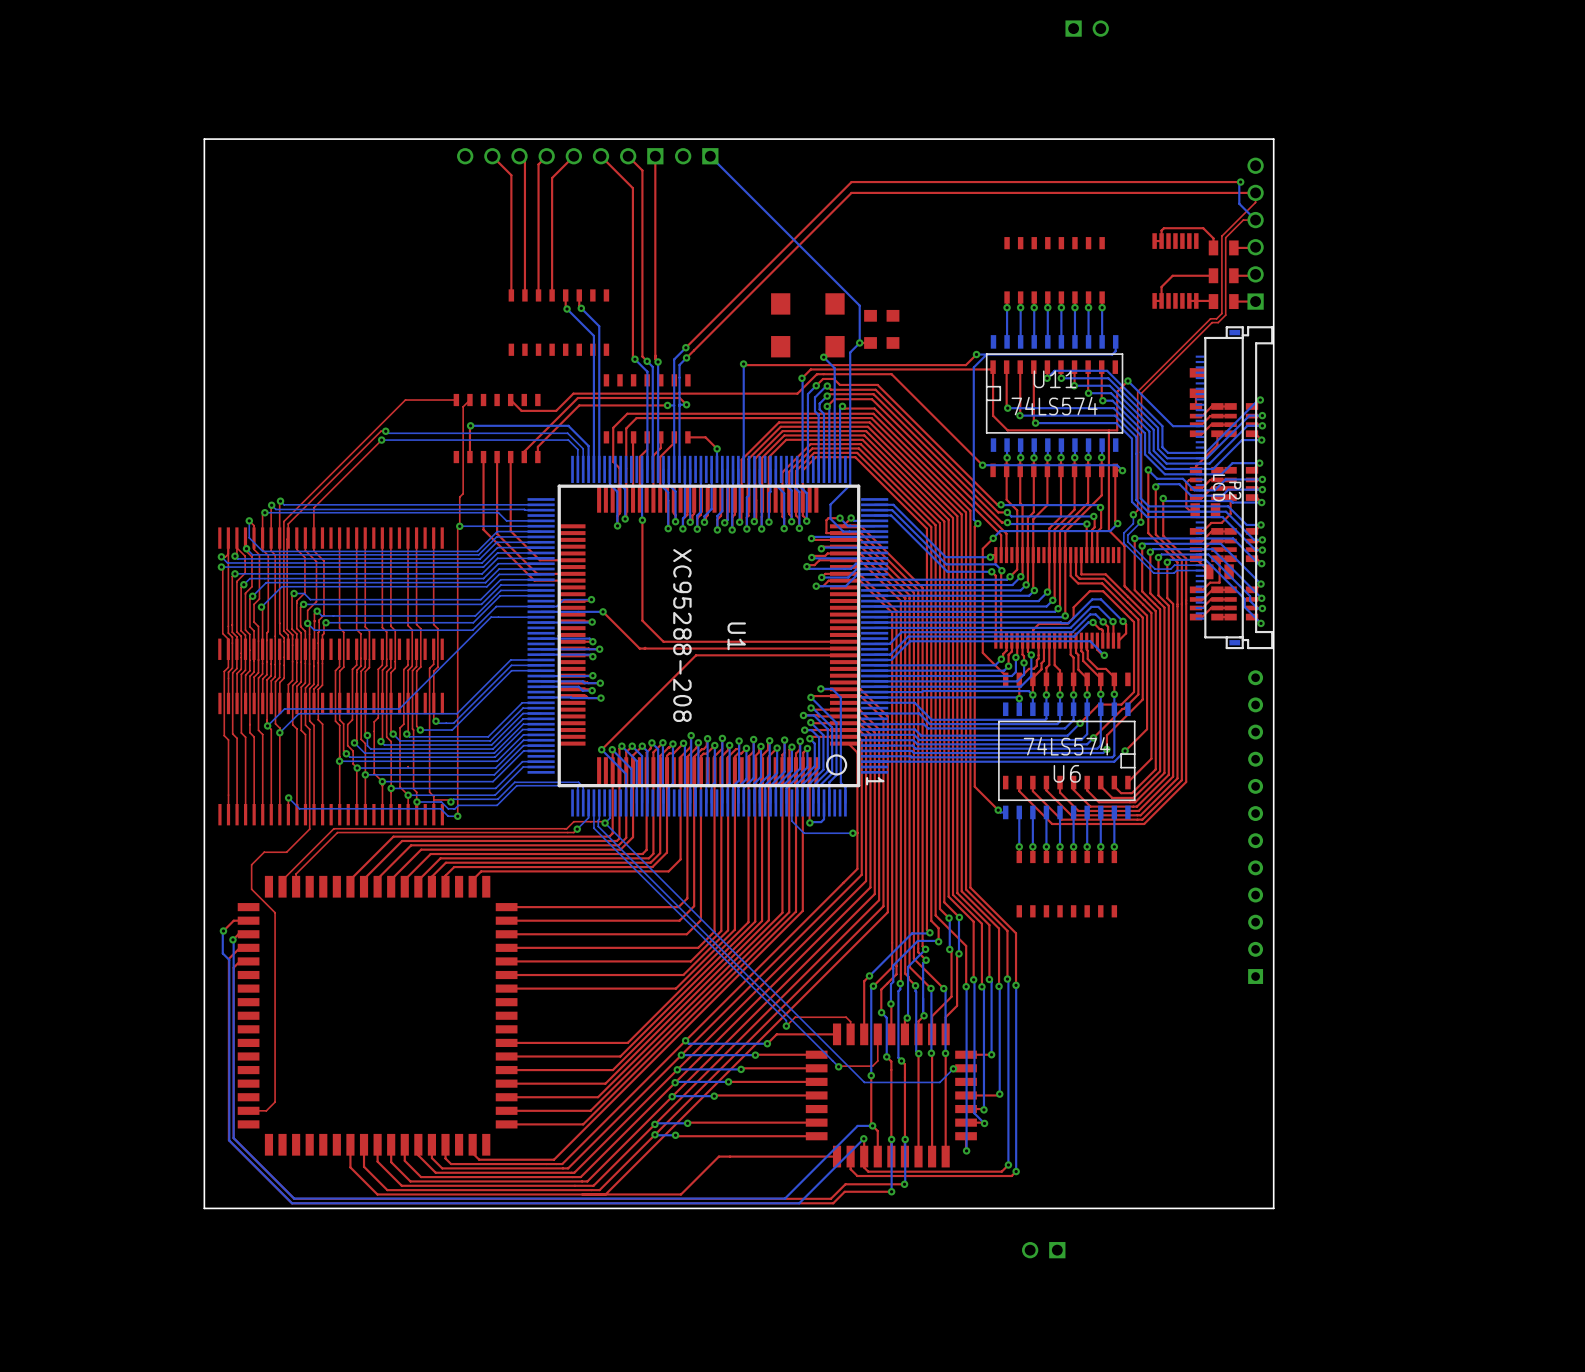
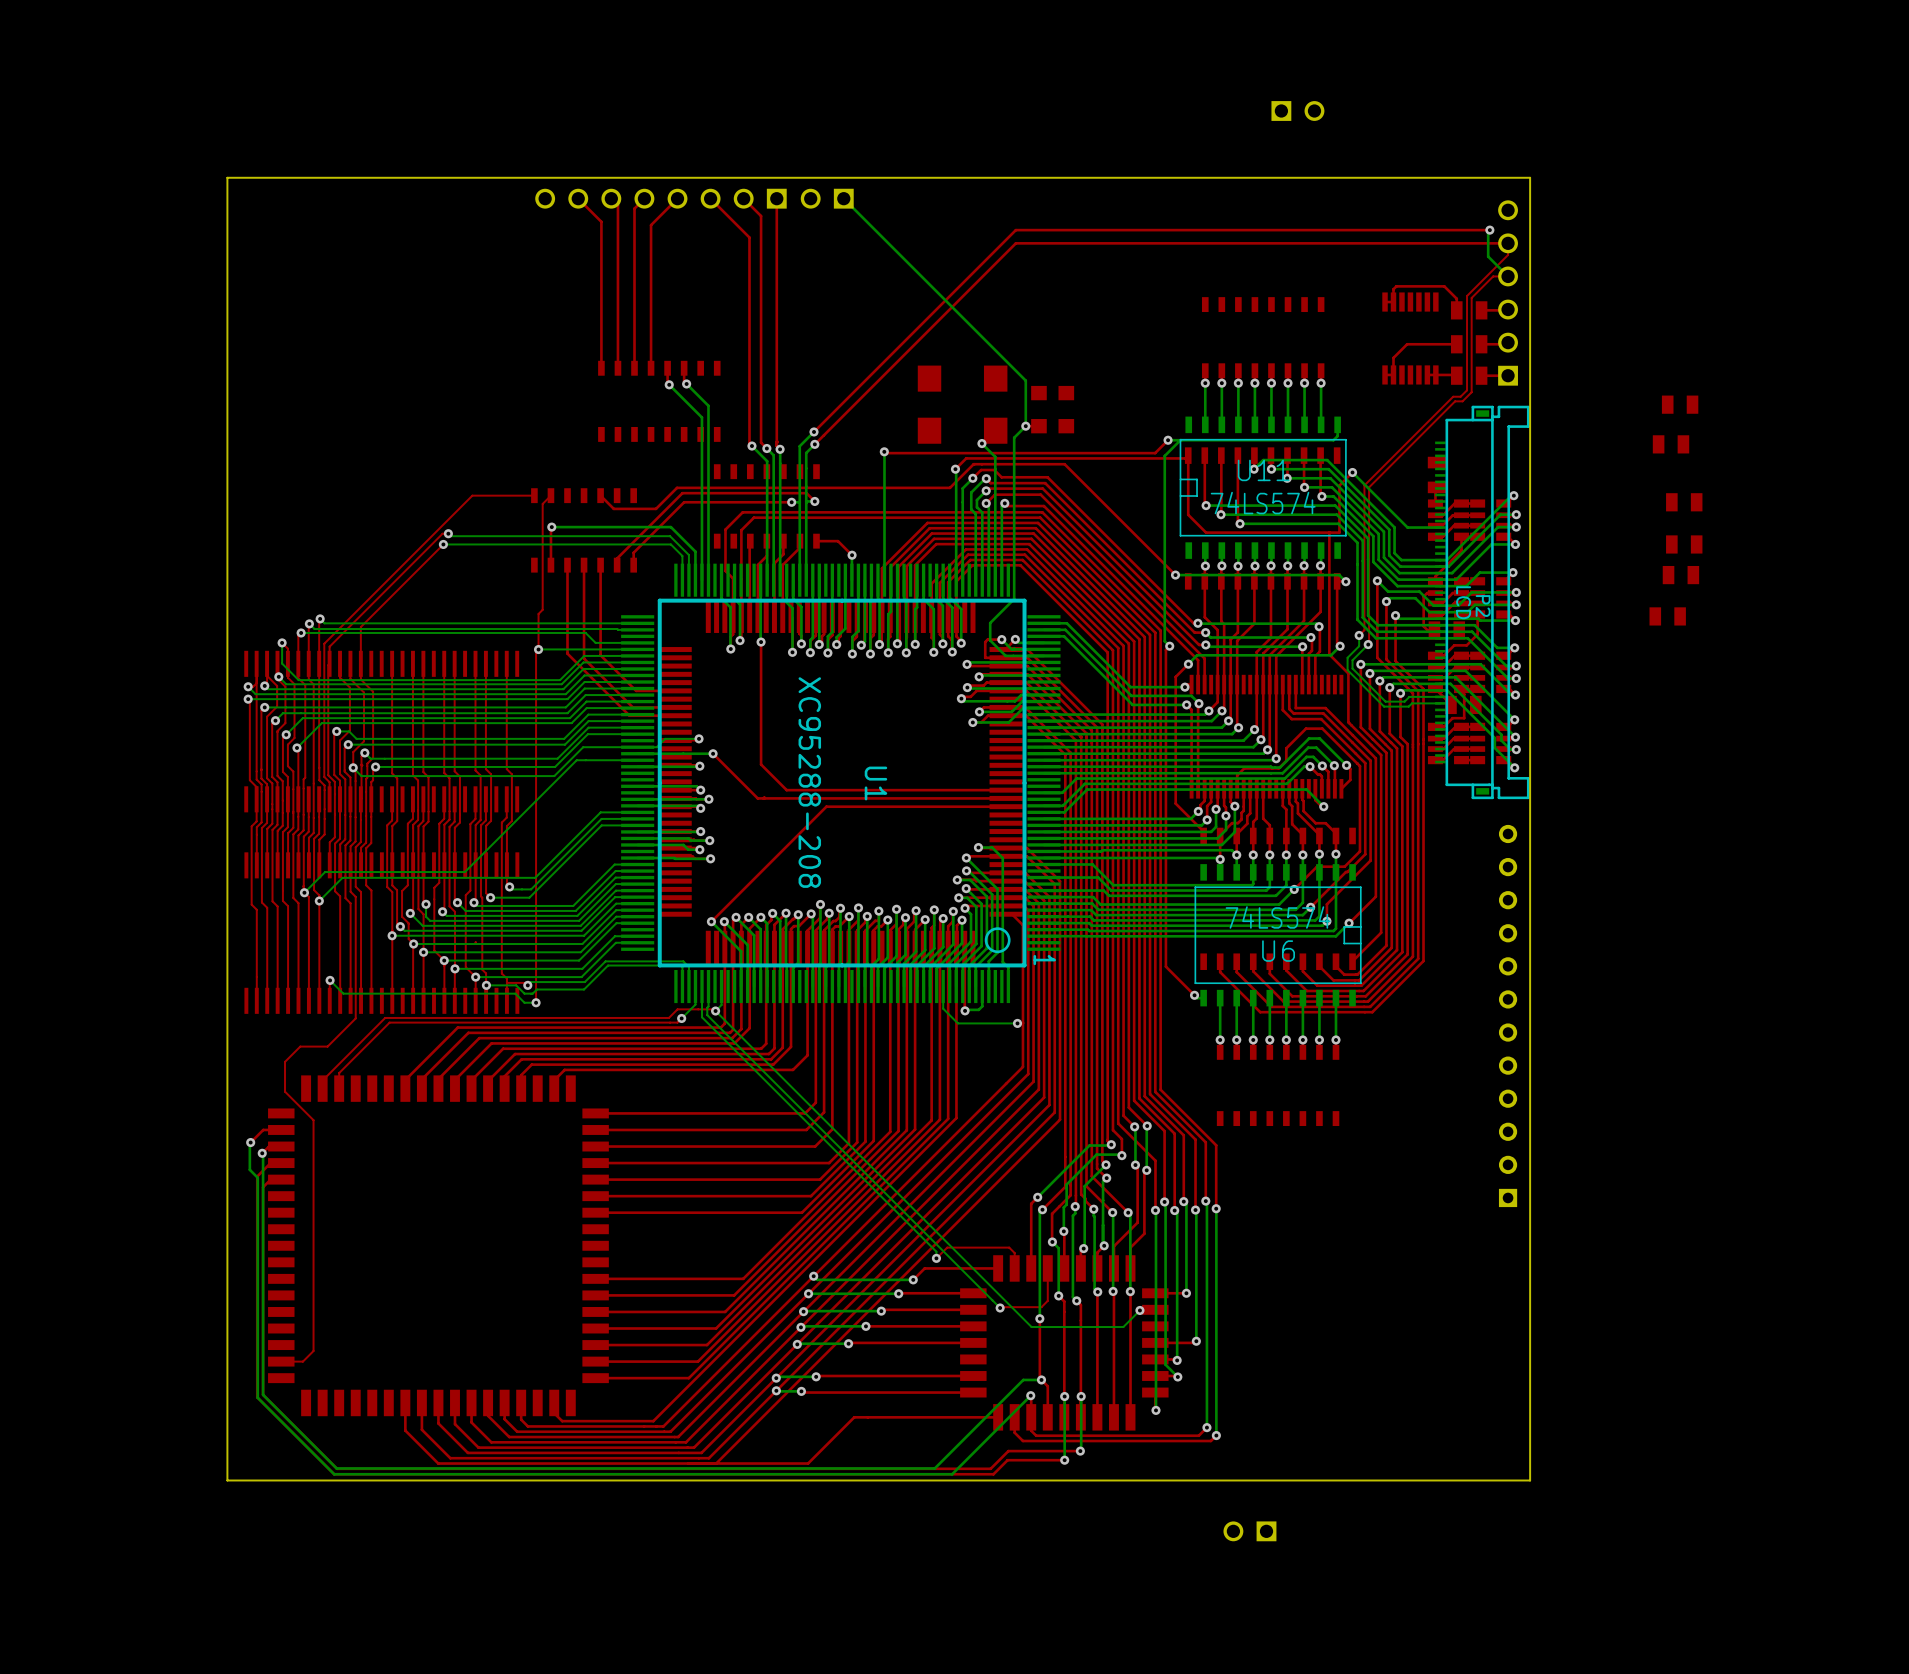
part position: (1087, 28) -> (1297, 111)
part: none -> (1680, 404)
part: none -> (1671, 444)
part: none -> (1684, 502)
part: none -> (1684, 544)
part: none -> (1680, 575)
part: none -> (1667, 616)

